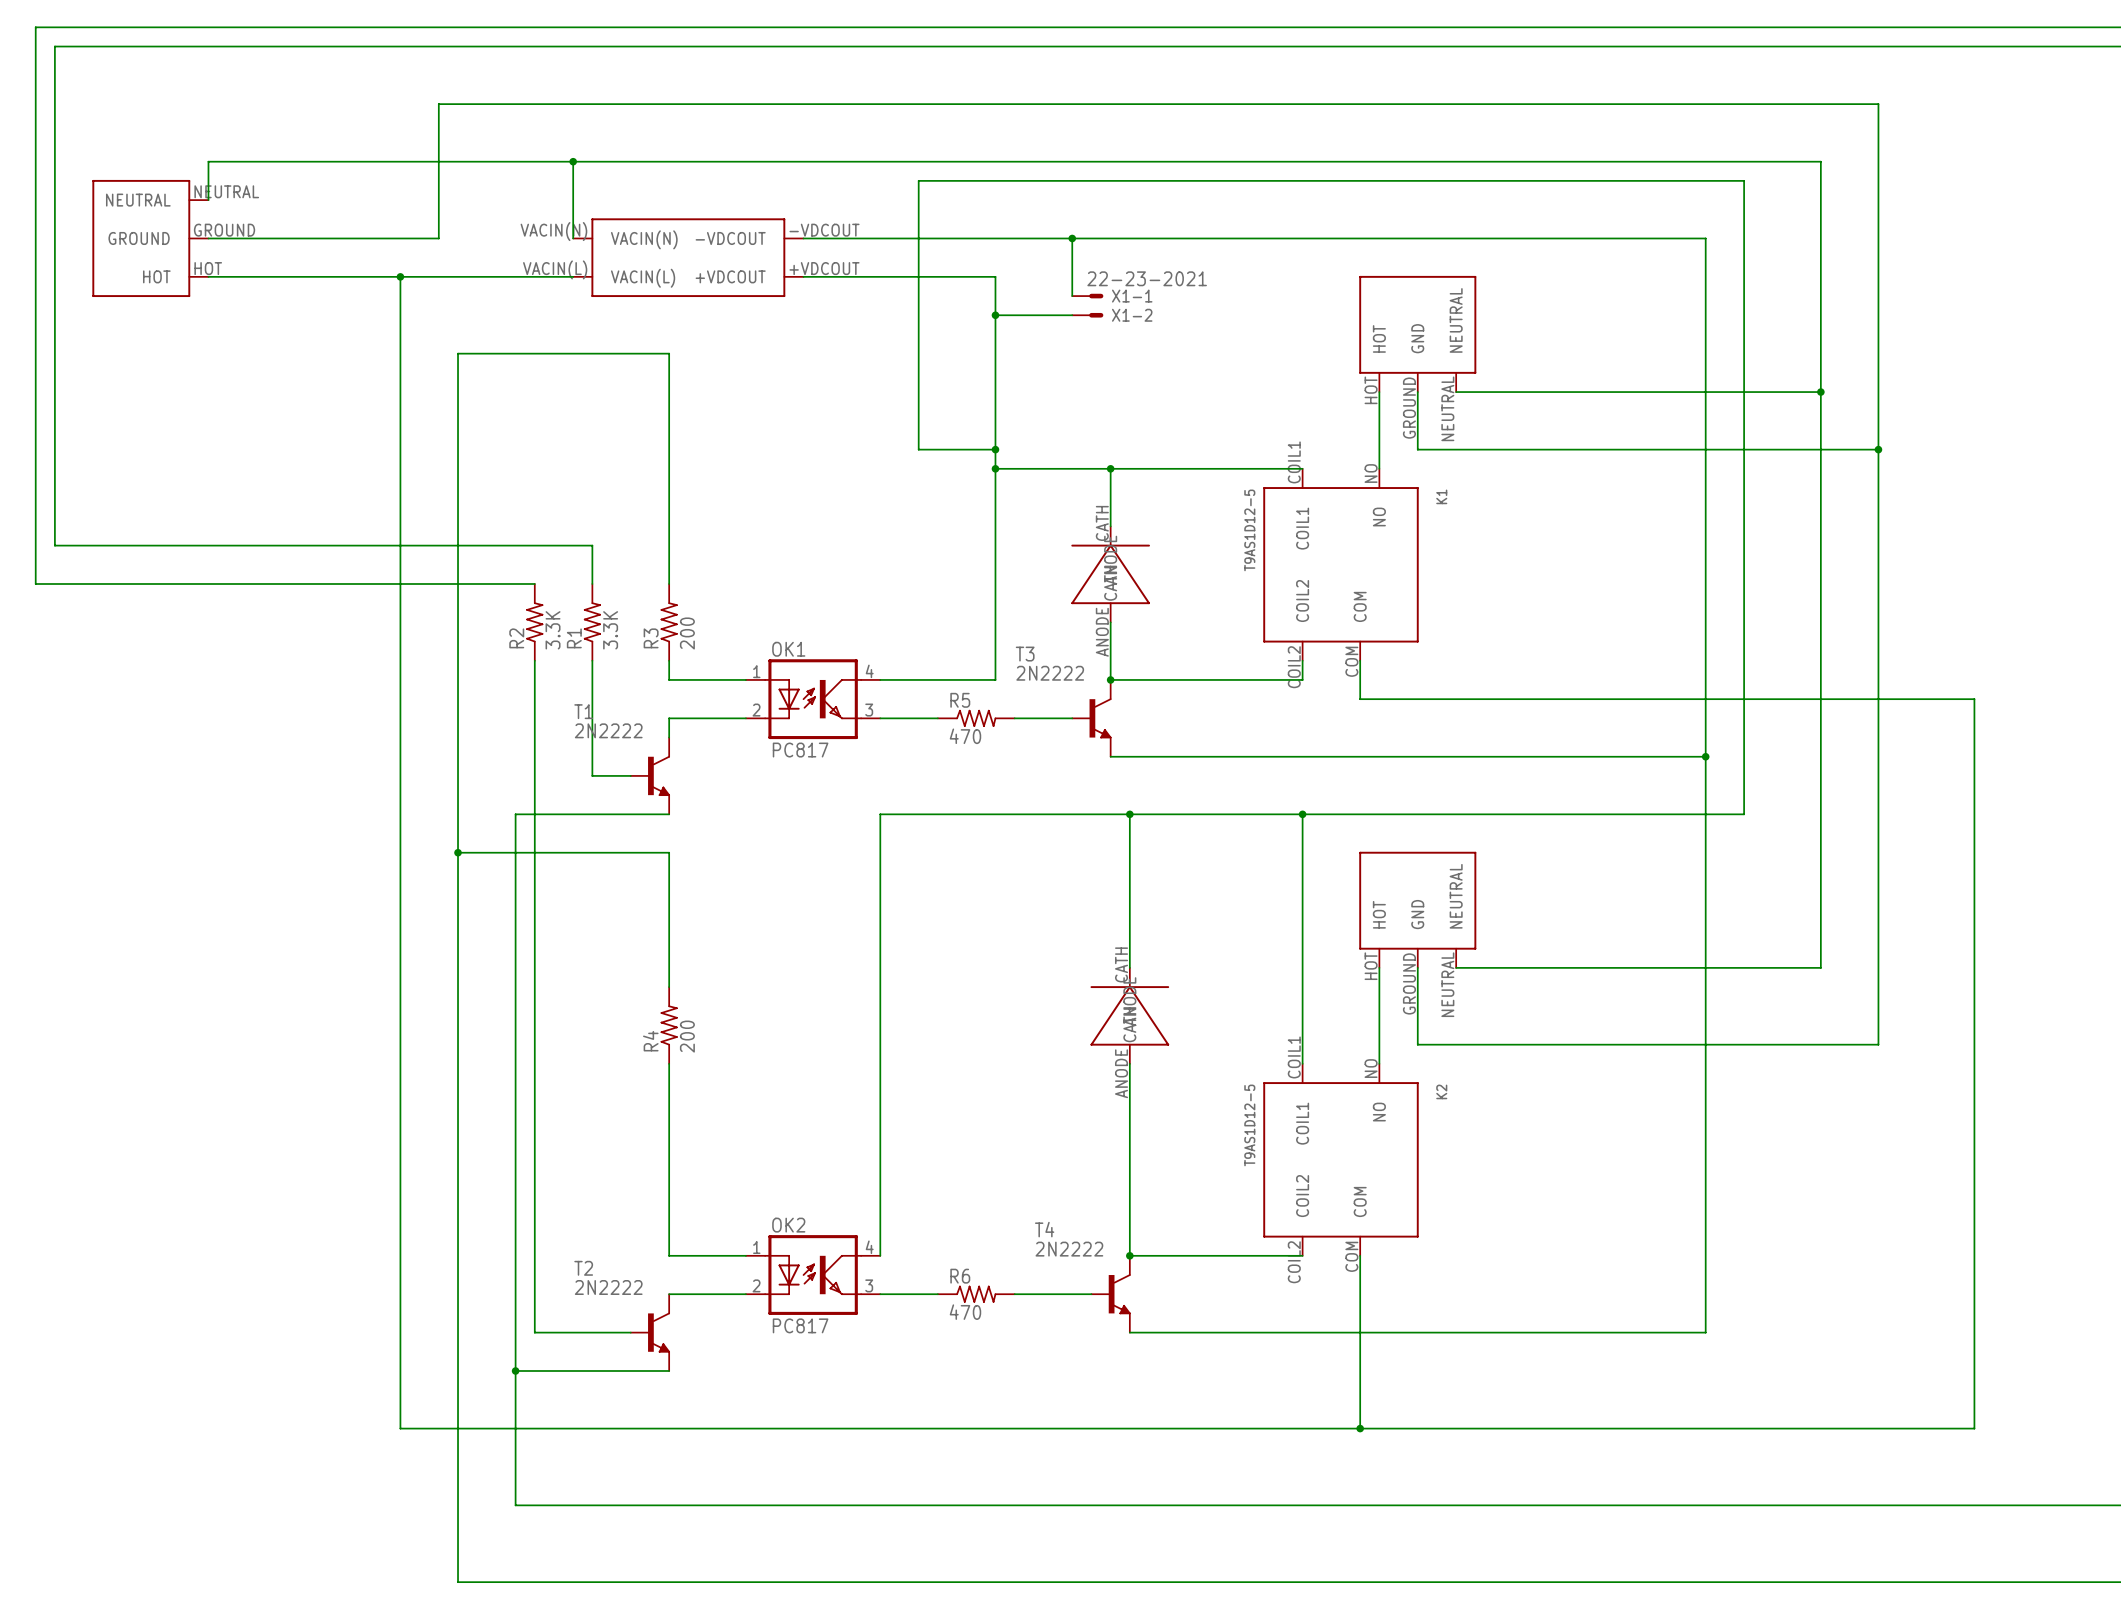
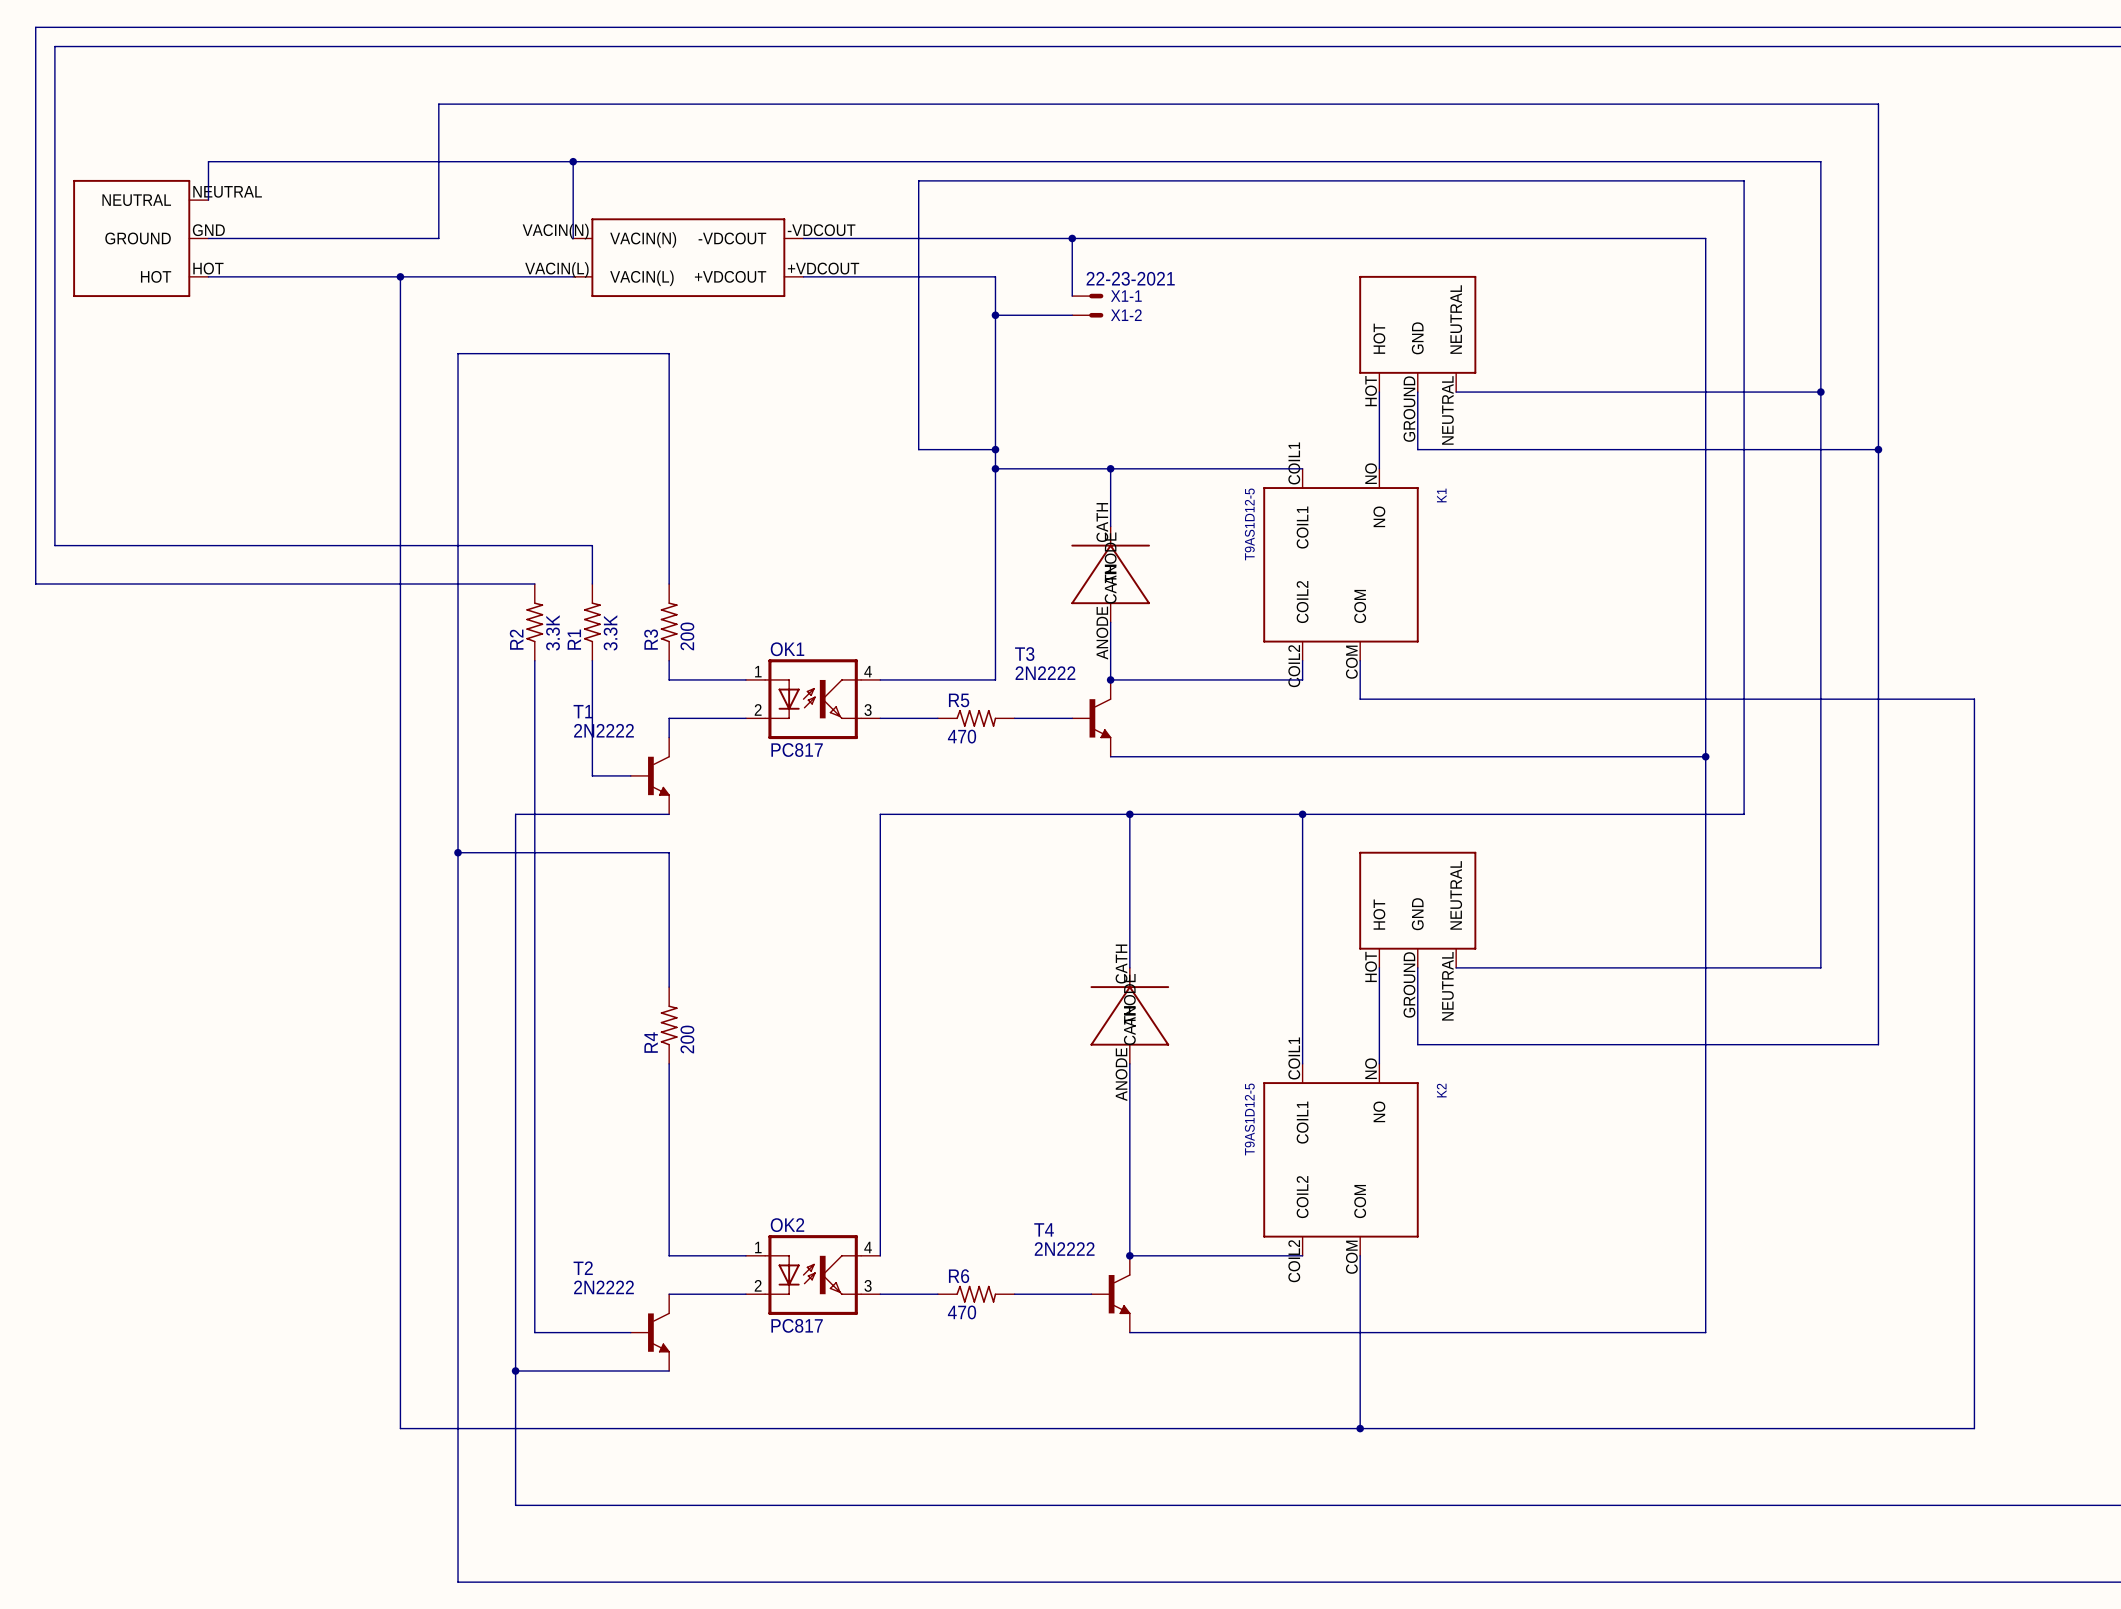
part: none -> (140, 238)
part: (150, 238) -> none

